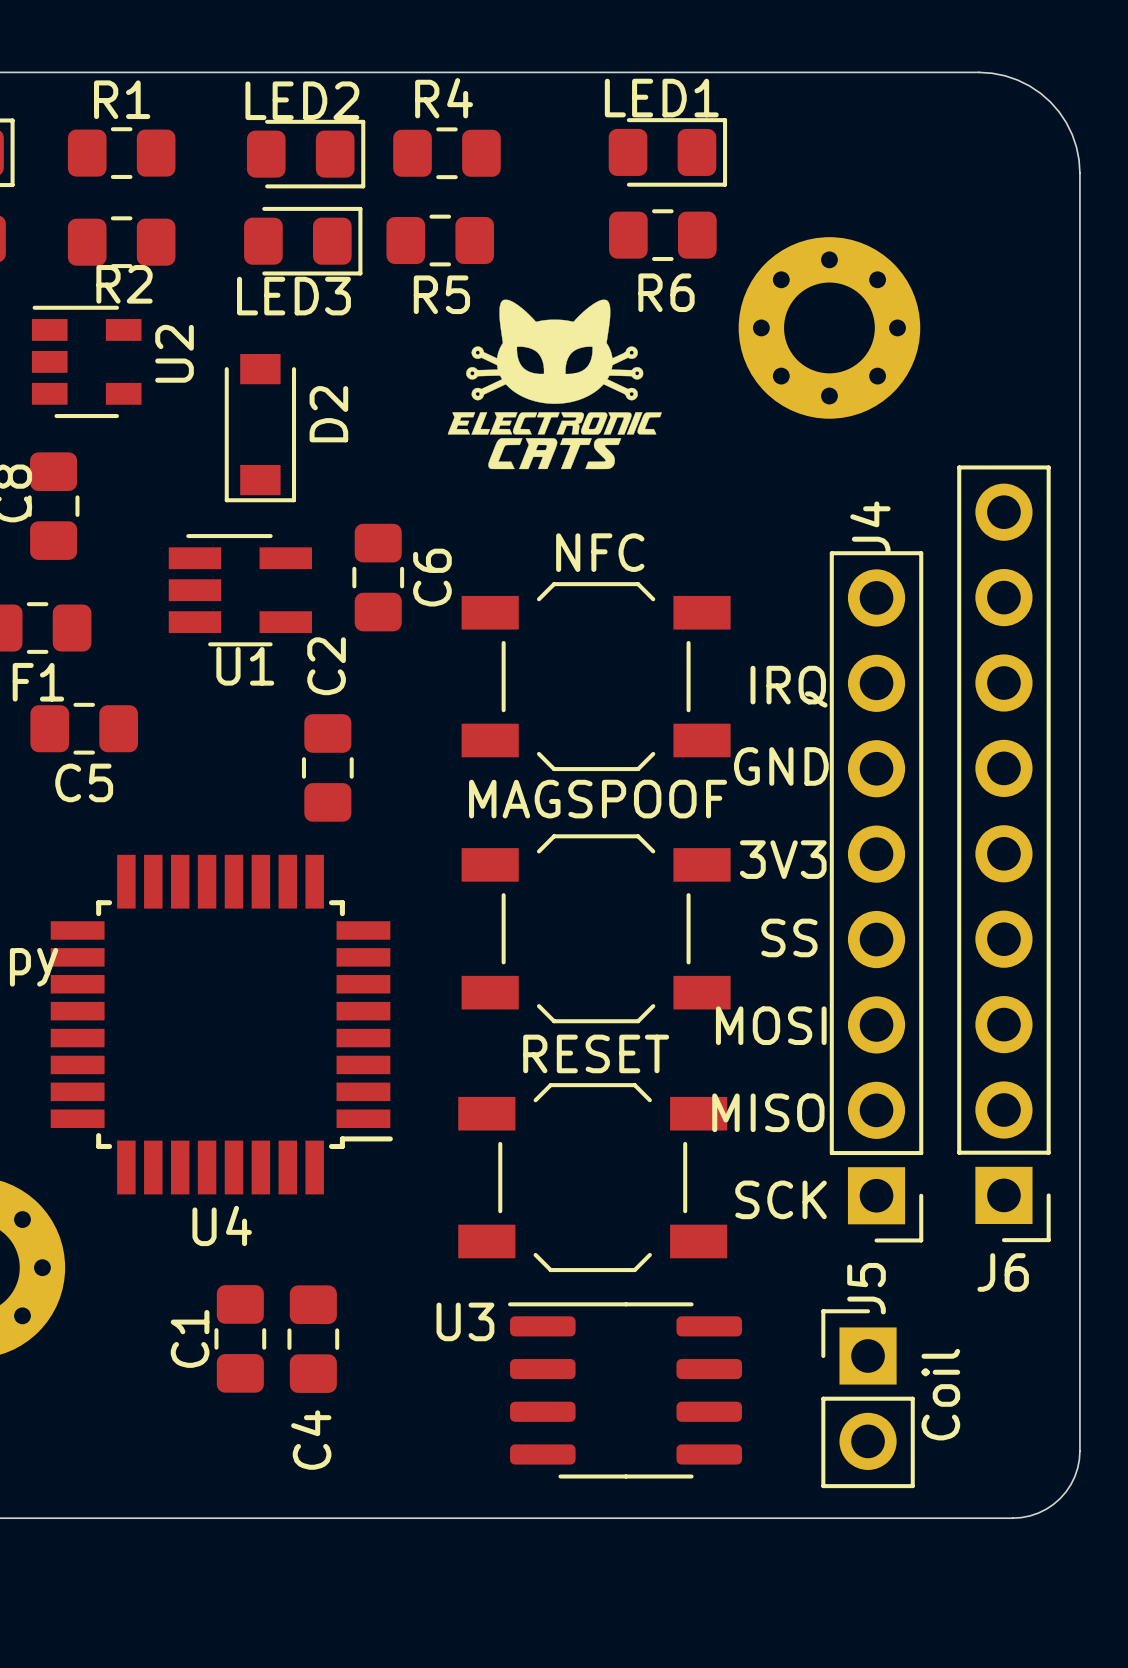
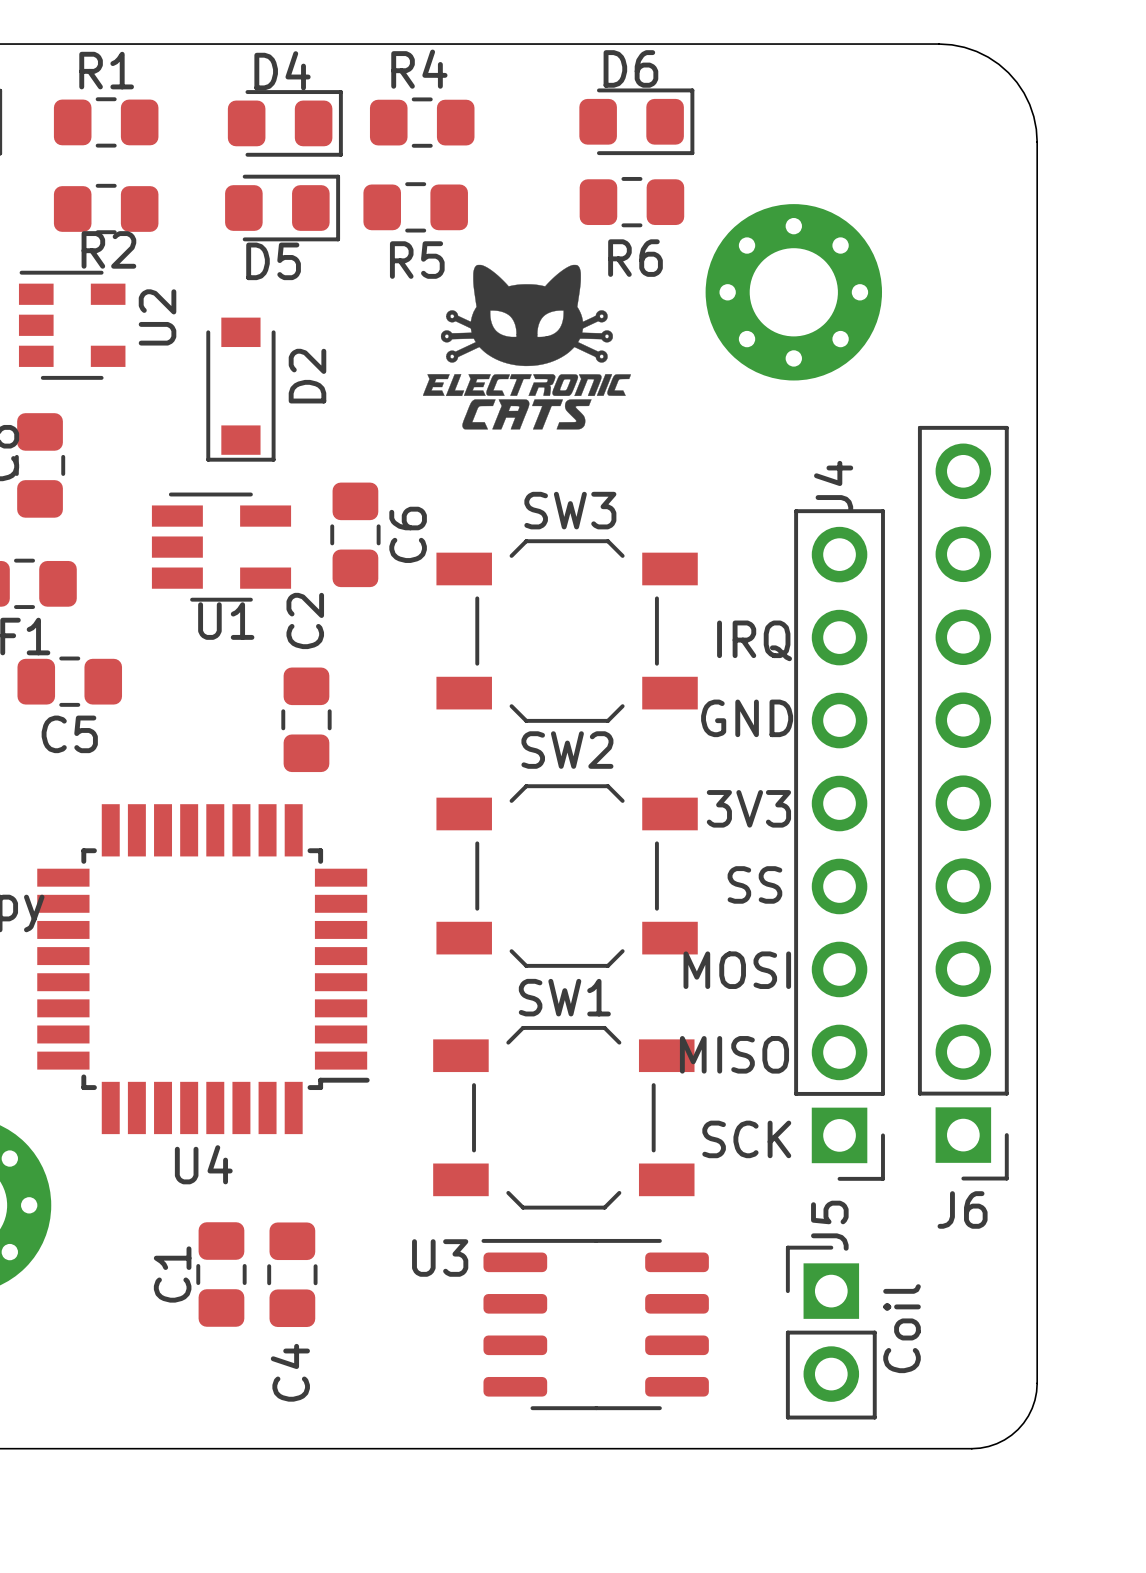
LED1 name: LED1 (661, 98) -> D6 (630, 68)
LED2 name: LED2 (302, 100) -> D4 (282, 70)
LED3 name: LED3 (293, 296) -> D5 (273, 261)
NFC name: NFC (600, 552) -> SW3 (570, 510)
MAGSPOOF name: MAGSPOOF (598, 799) -> SW2 (567, 750)
RESET name: RESET (596, 1053) -> SW1 (564, 997)

